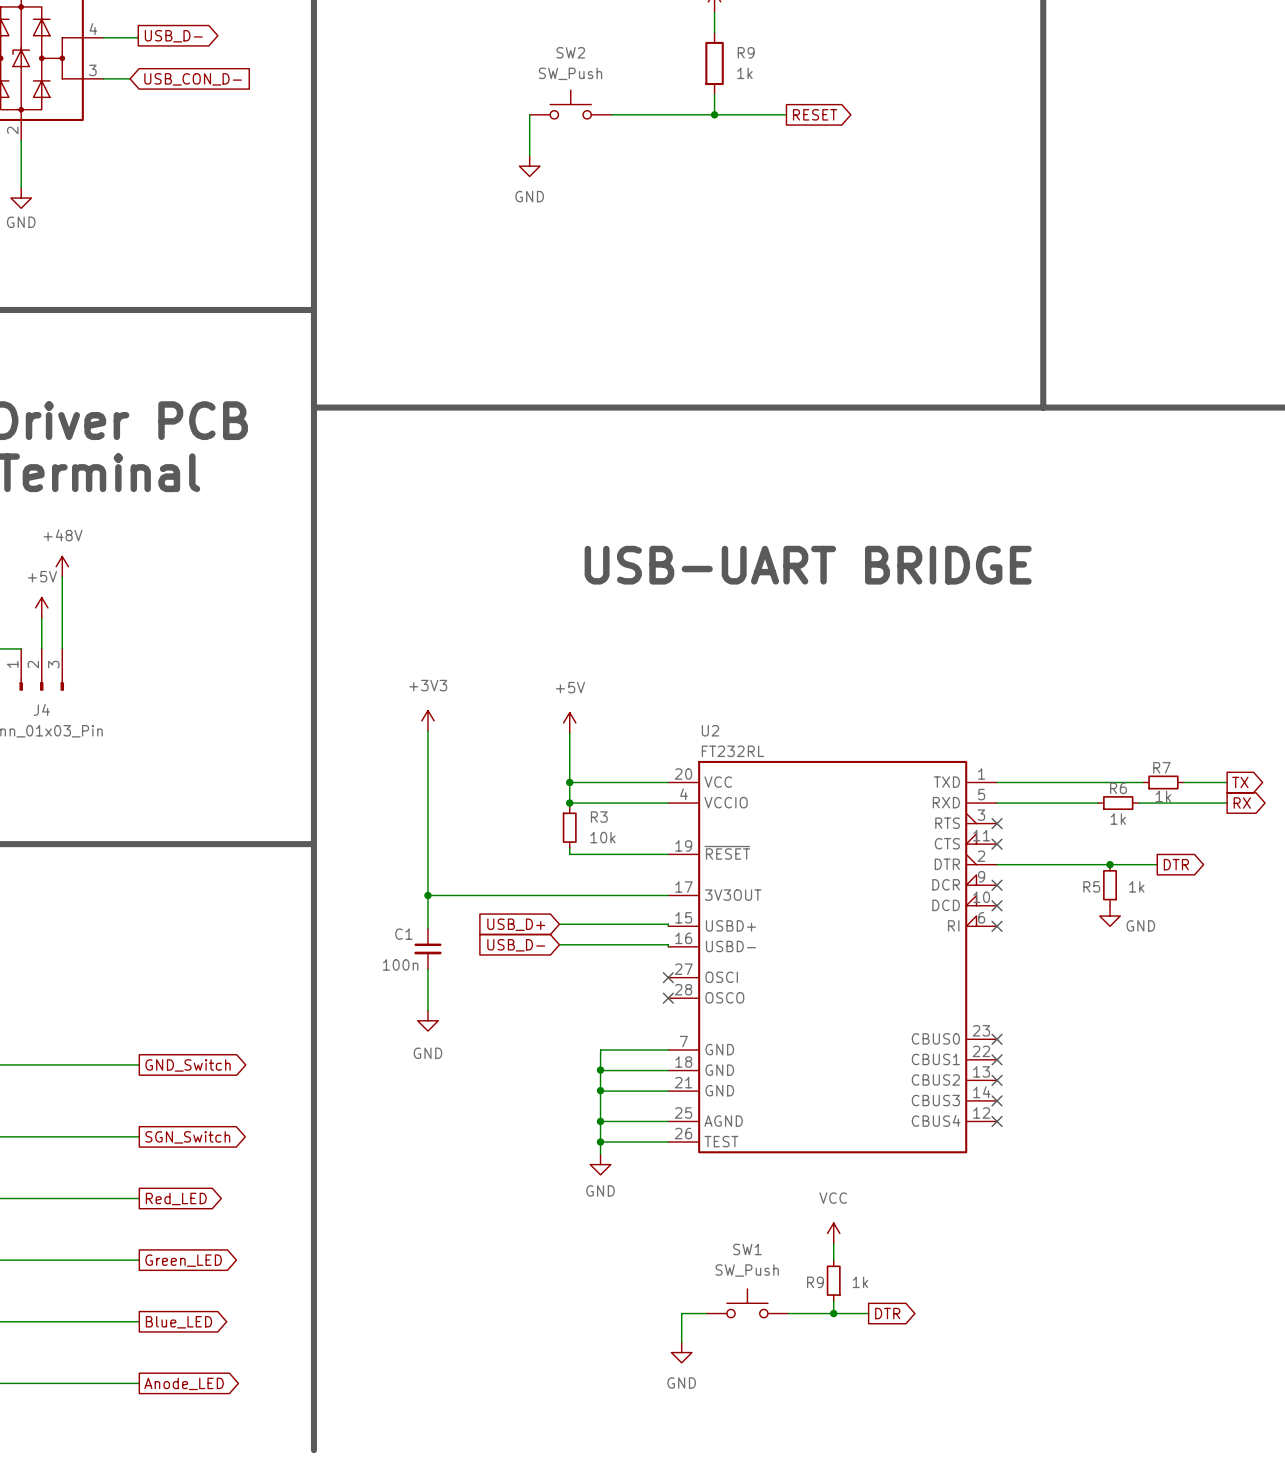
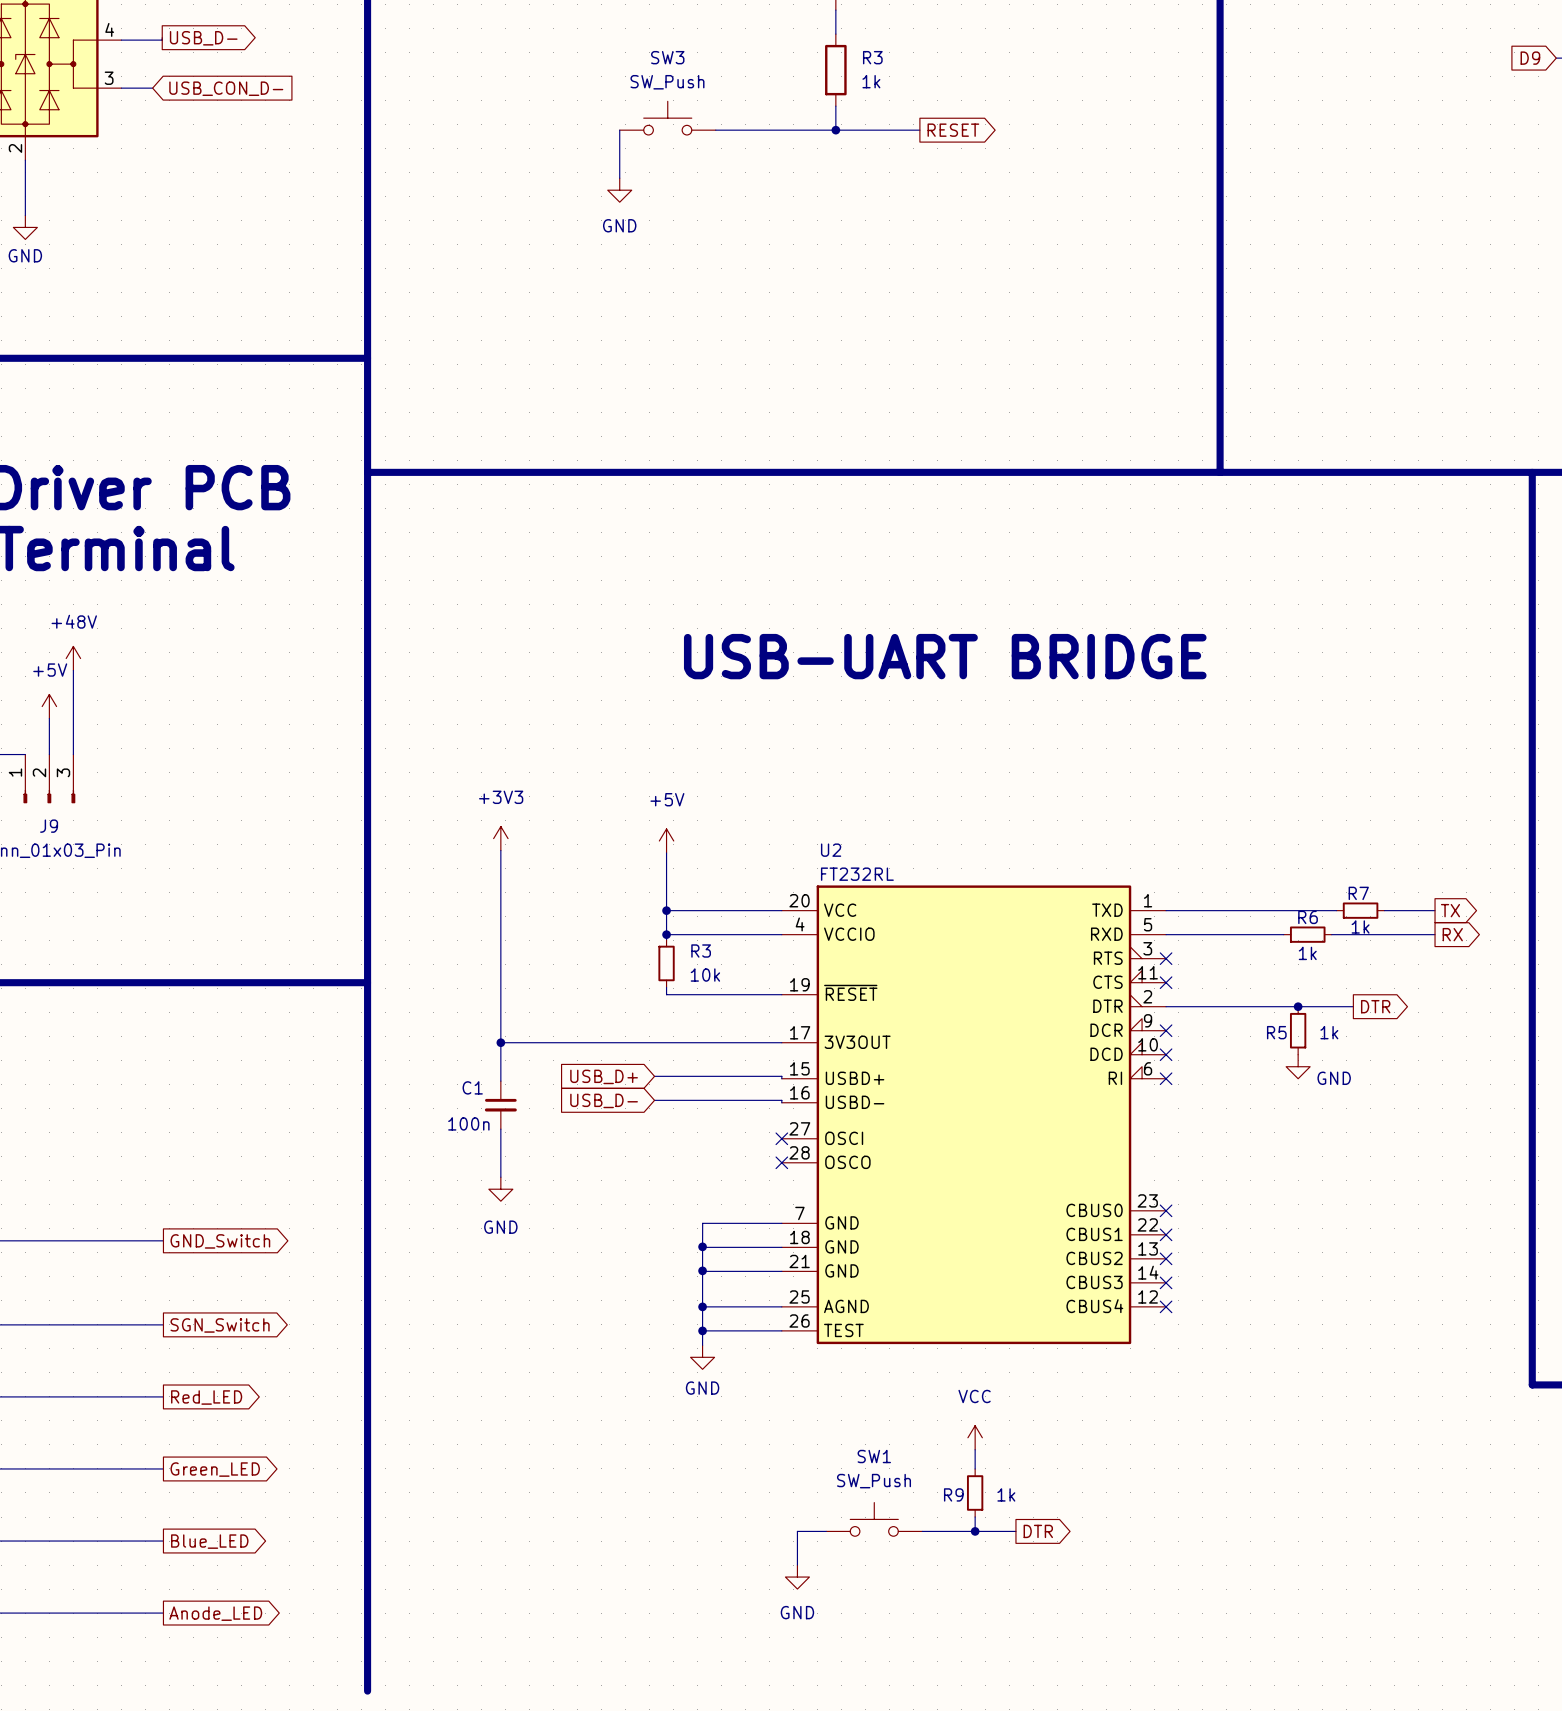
SW2 name: SW2 (570, 52) -> SW3 (667, 57)
R9 name: R9 (746, 52) -> R3 (872, 57)
J4 name: J4 (41, 709) -> J9 (49, 826)

